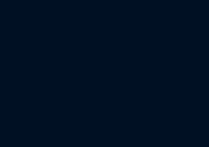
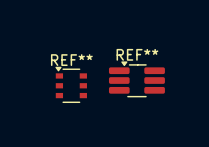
REF**: none -> (136, 79)
REF**: none -> (71, 84)

